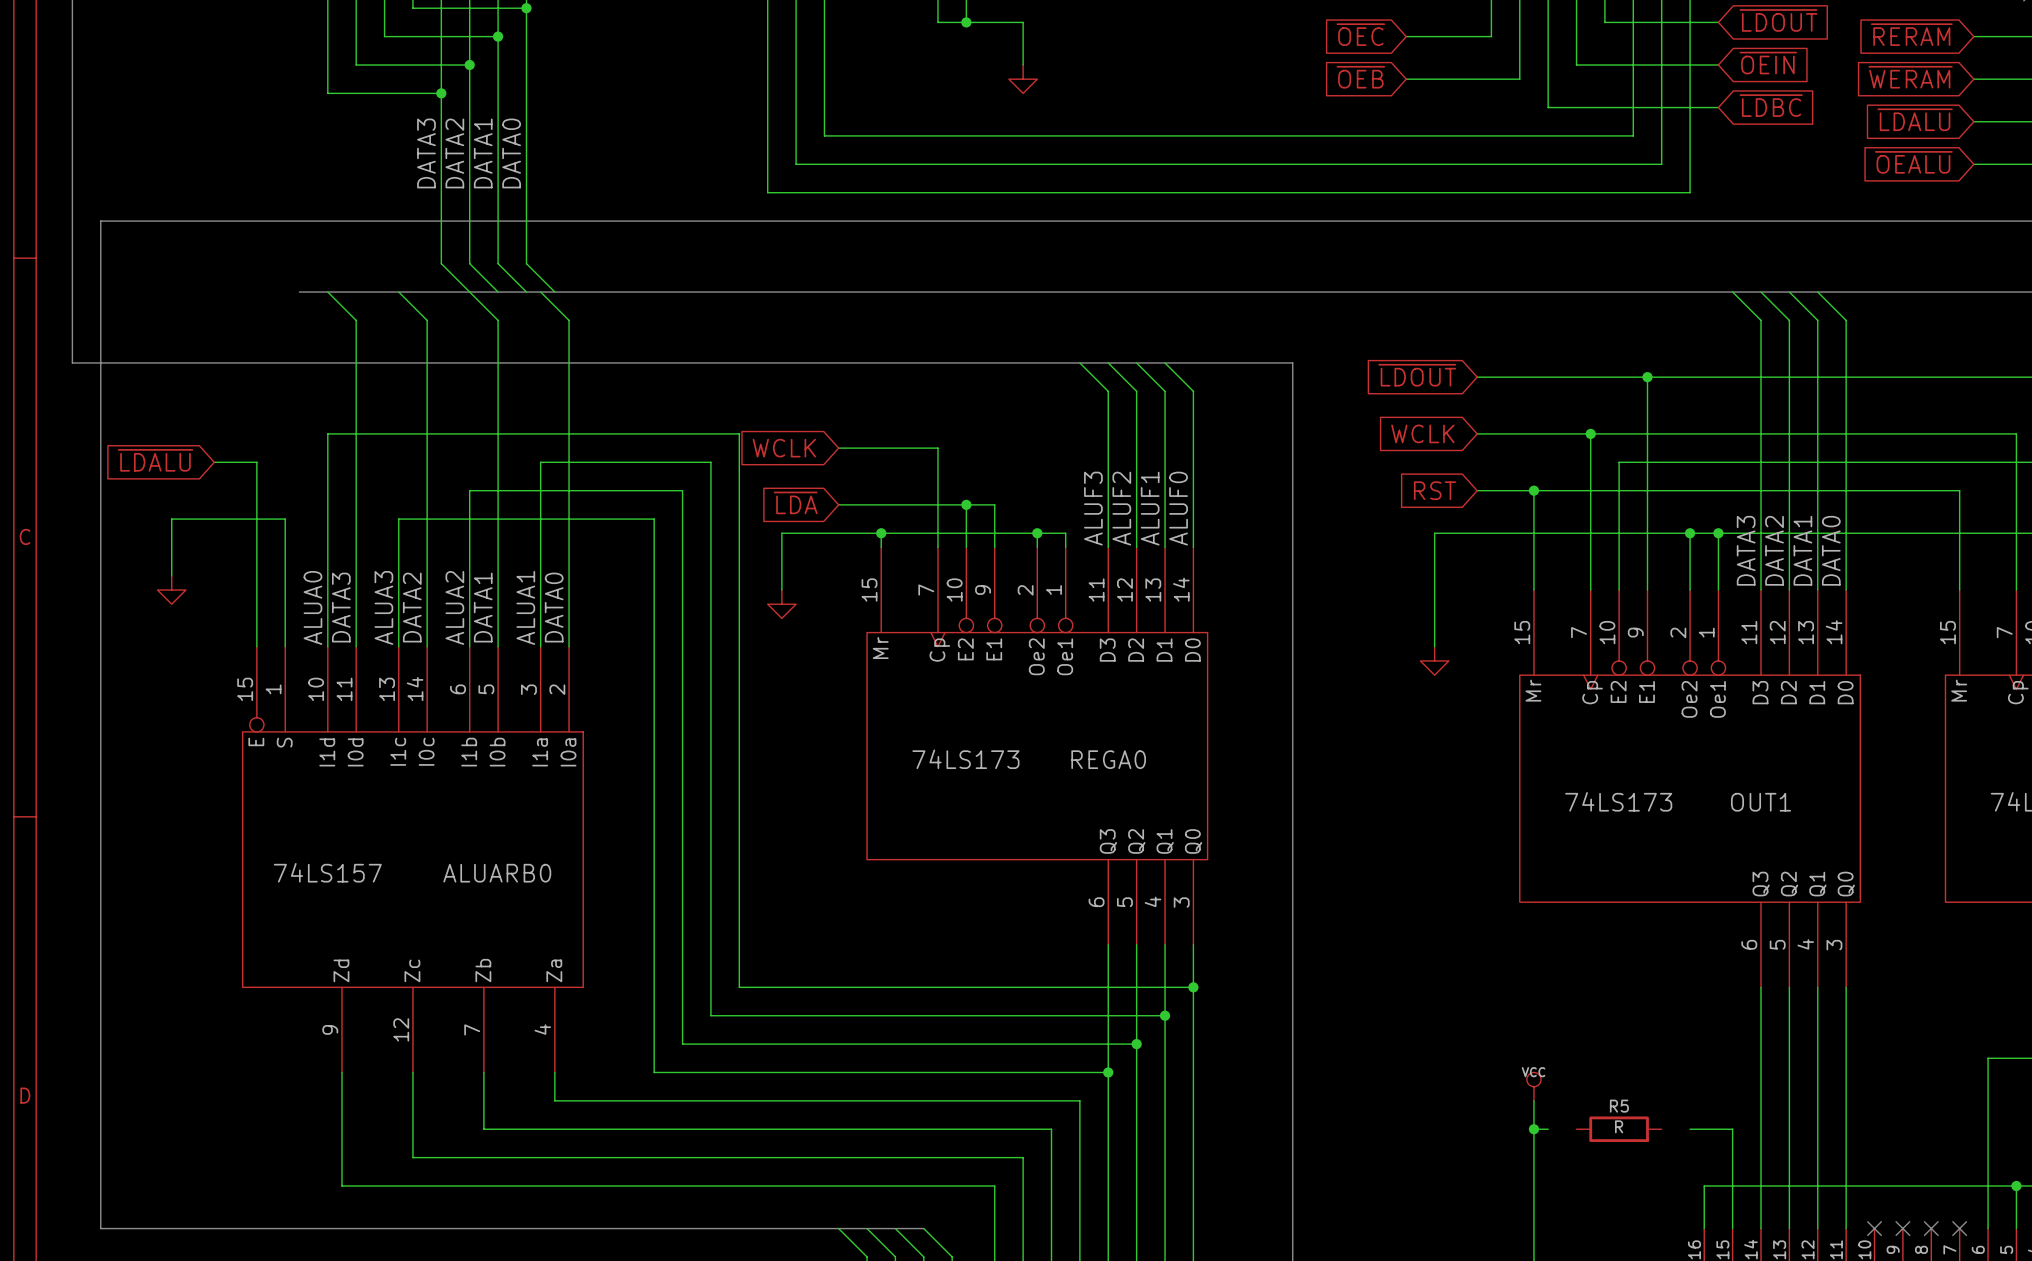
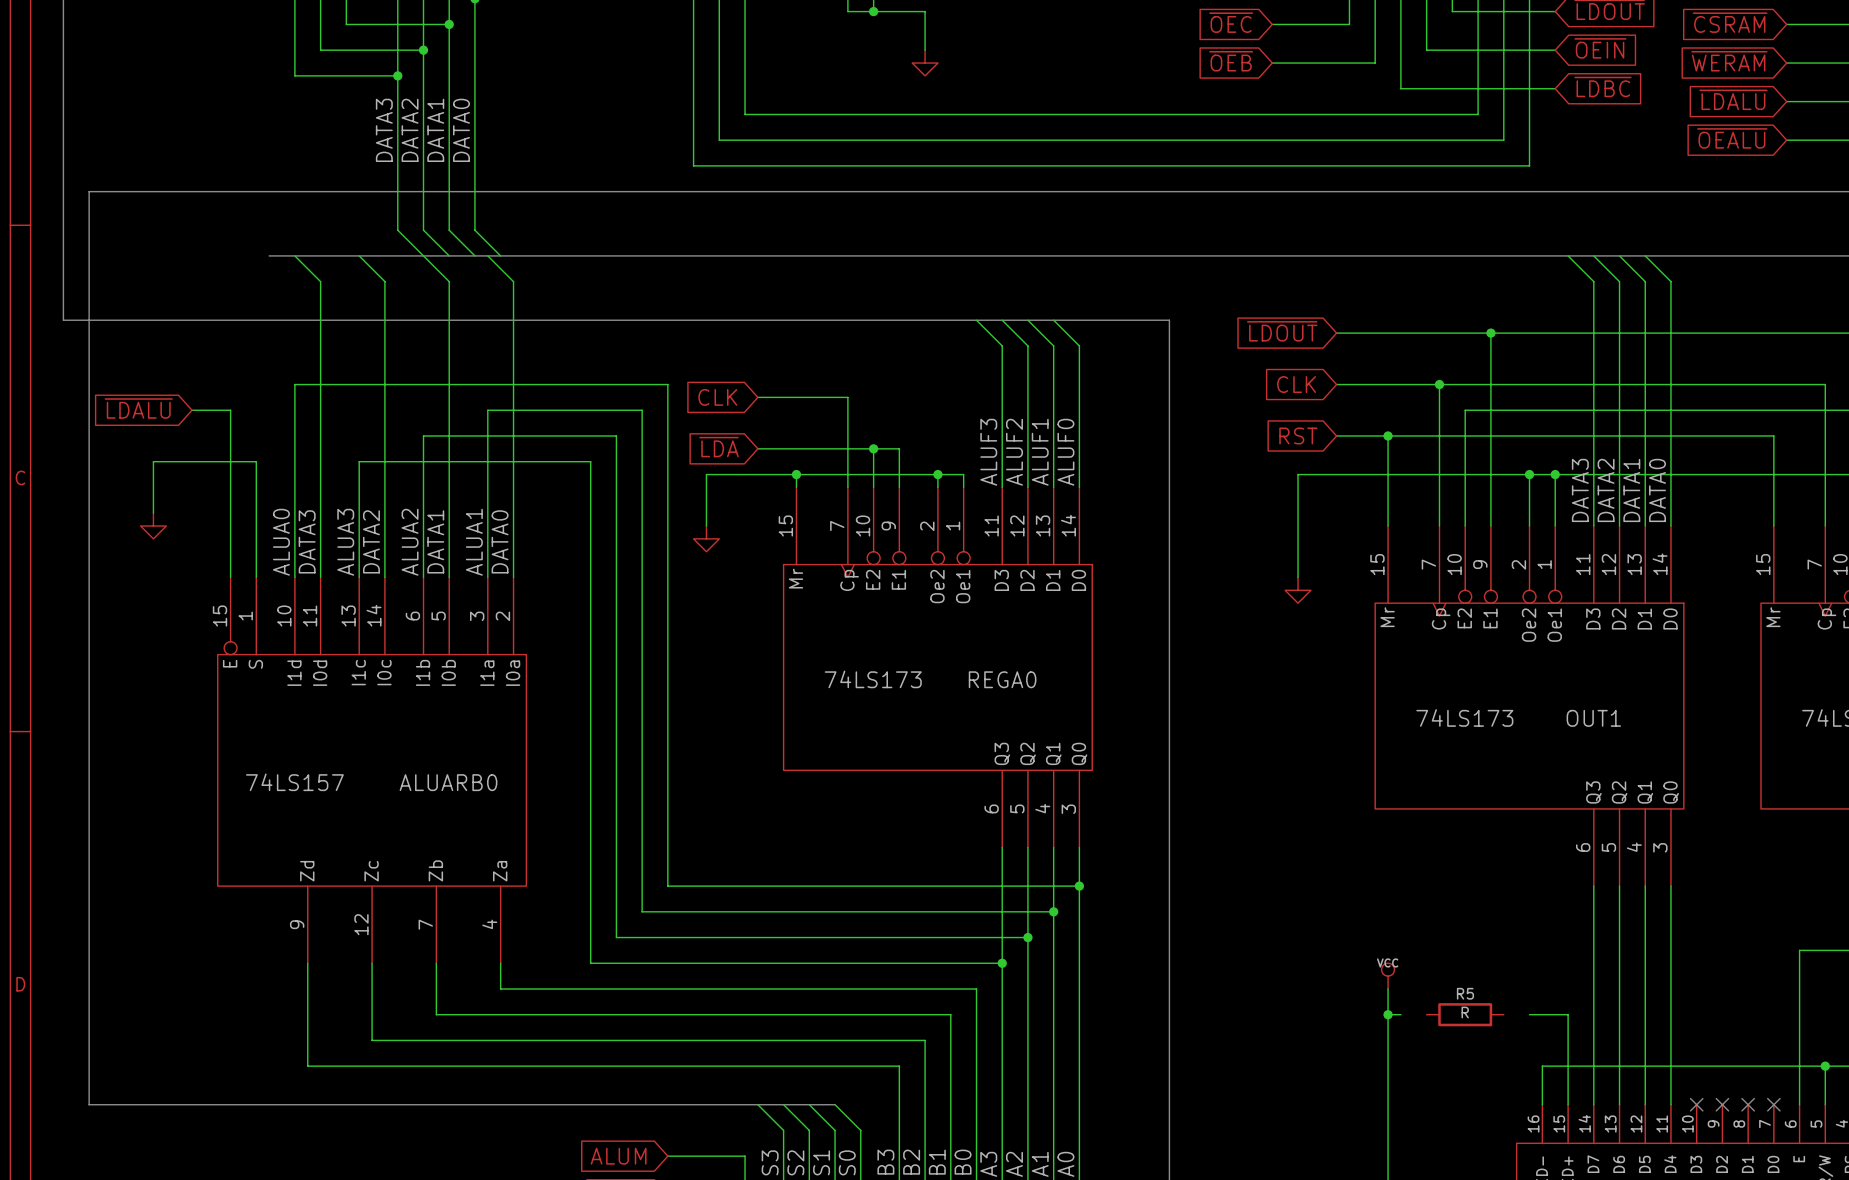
global label: ~{RERAM} (1911, 34) -> ~{CSRAM} (1730, 22)
global label: WCLK (1422, 433) -> CLK (1296, 384)
global label: WCLK (784, 448) -> CLK (717, 397)

